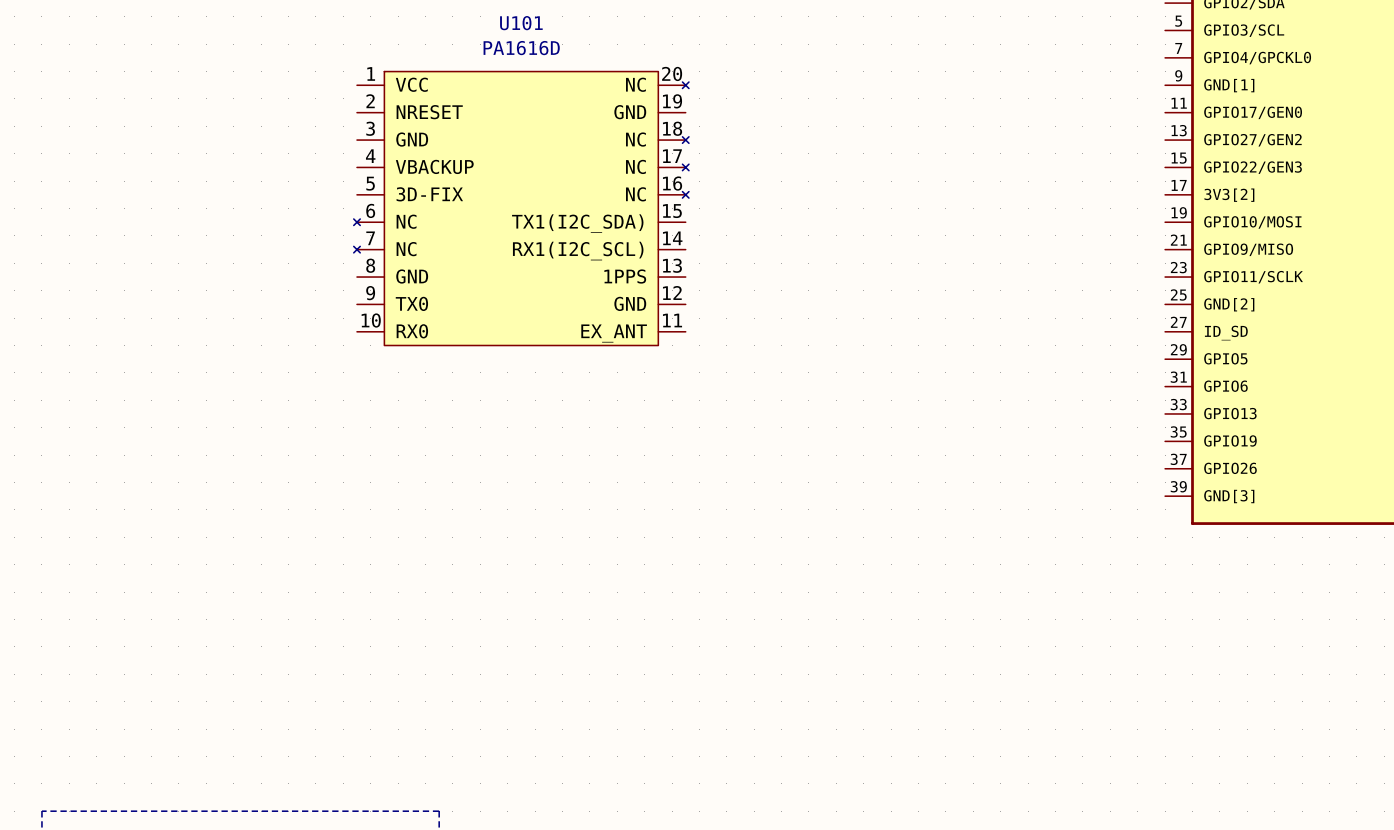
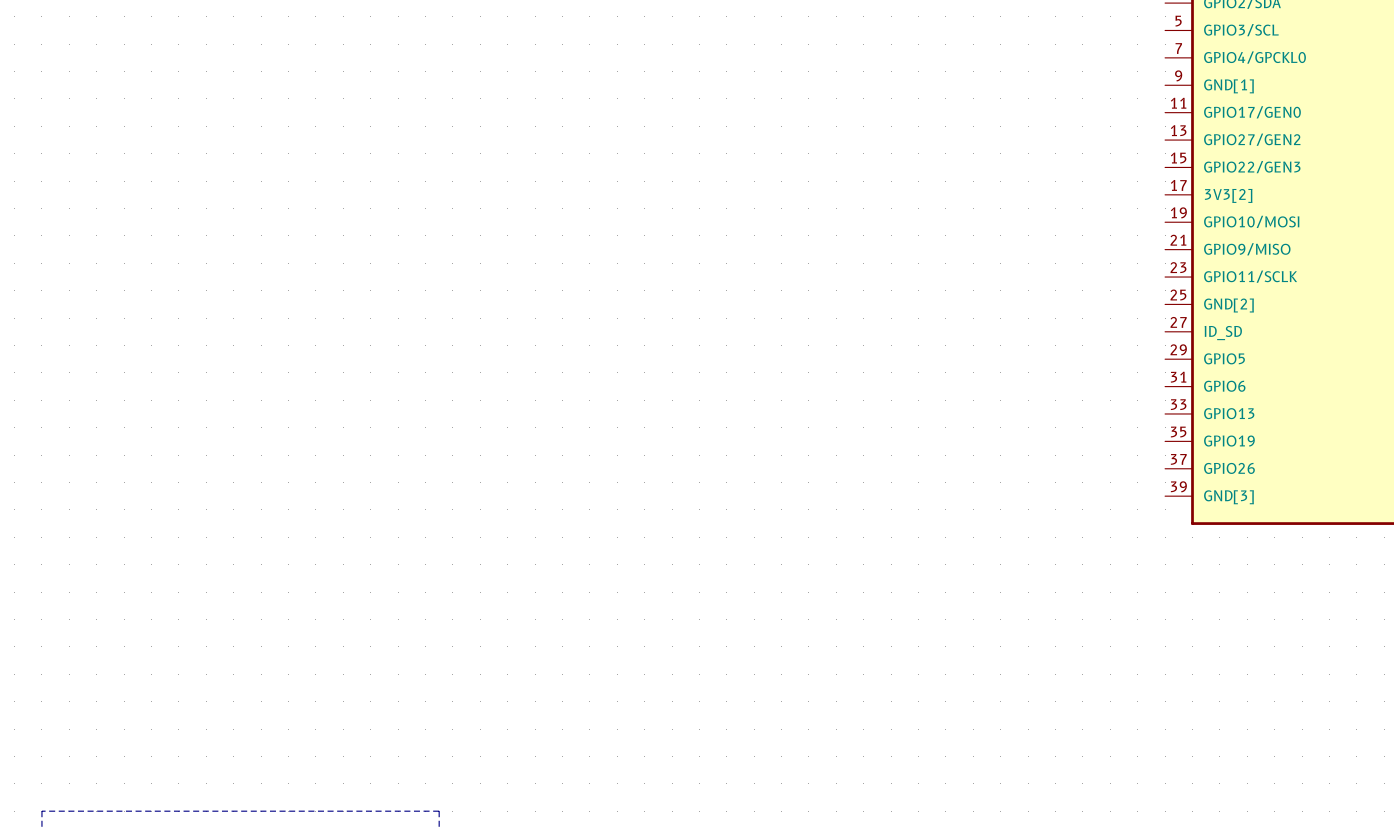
U101: PA1616D (521, 208) -> none

